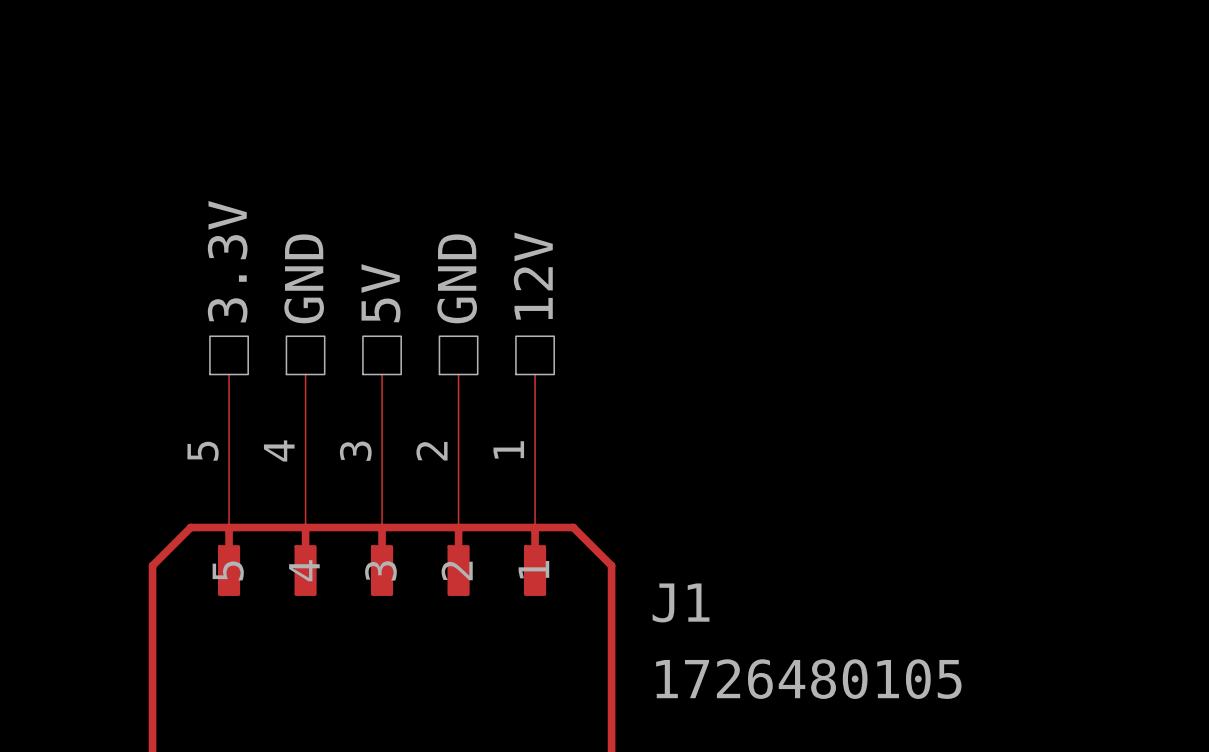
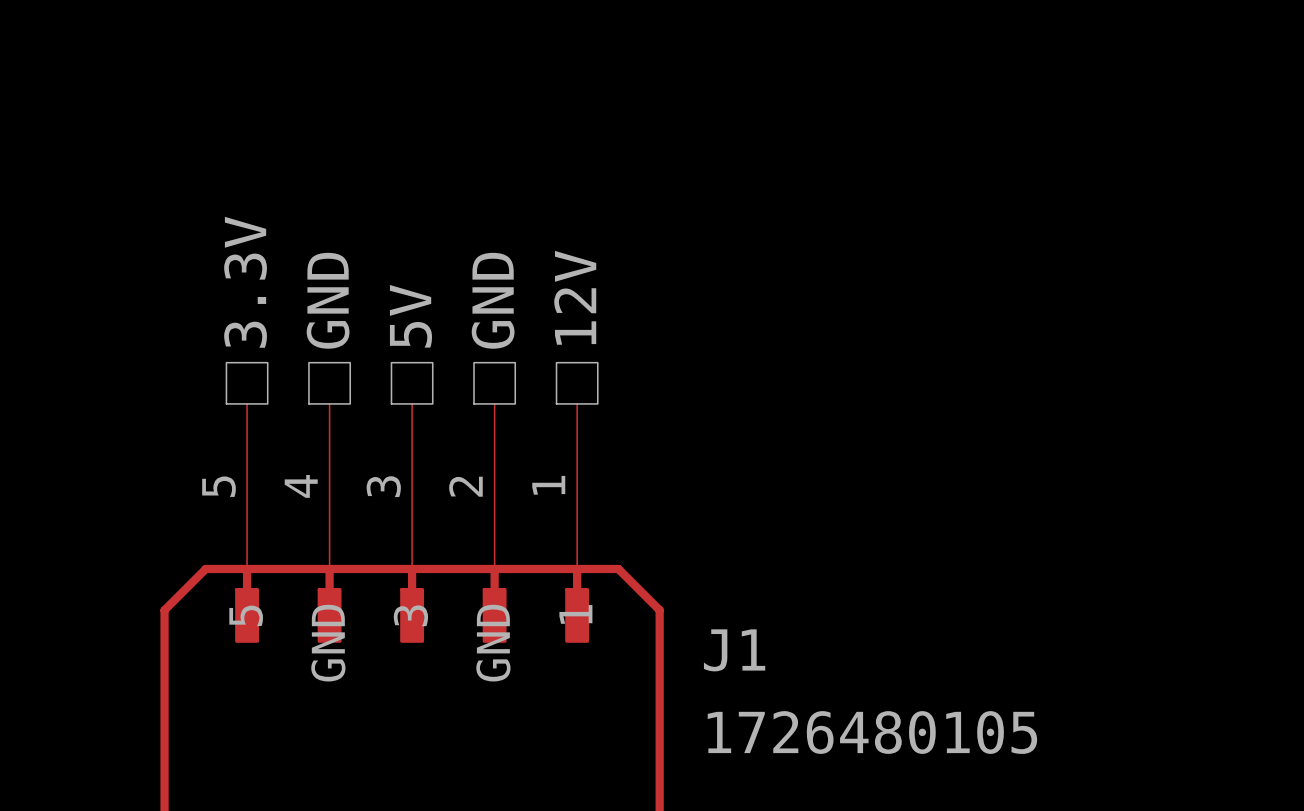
J1 pin name: 4 (304, 570) -> GND (328, 643)
J1 pin name: 2 (457, 570) -> GND (493, 643)

